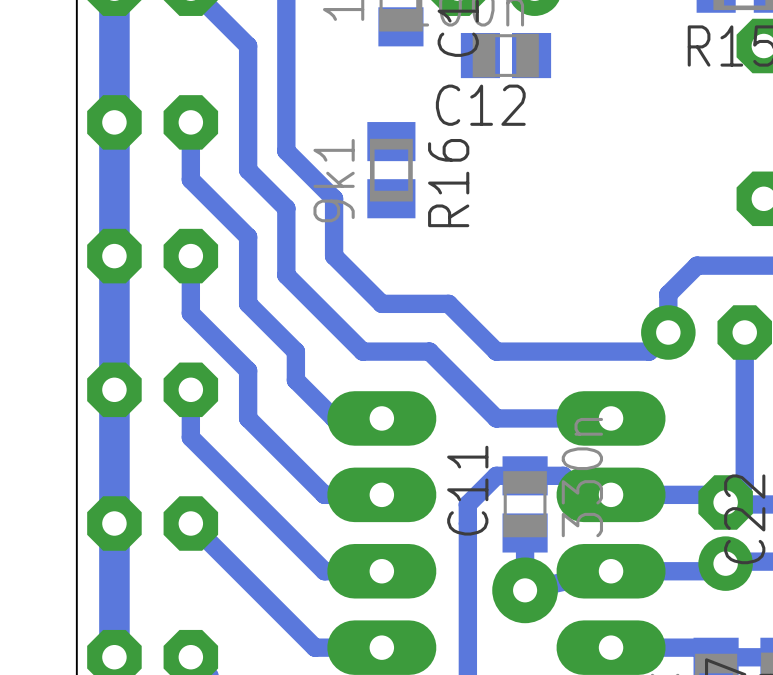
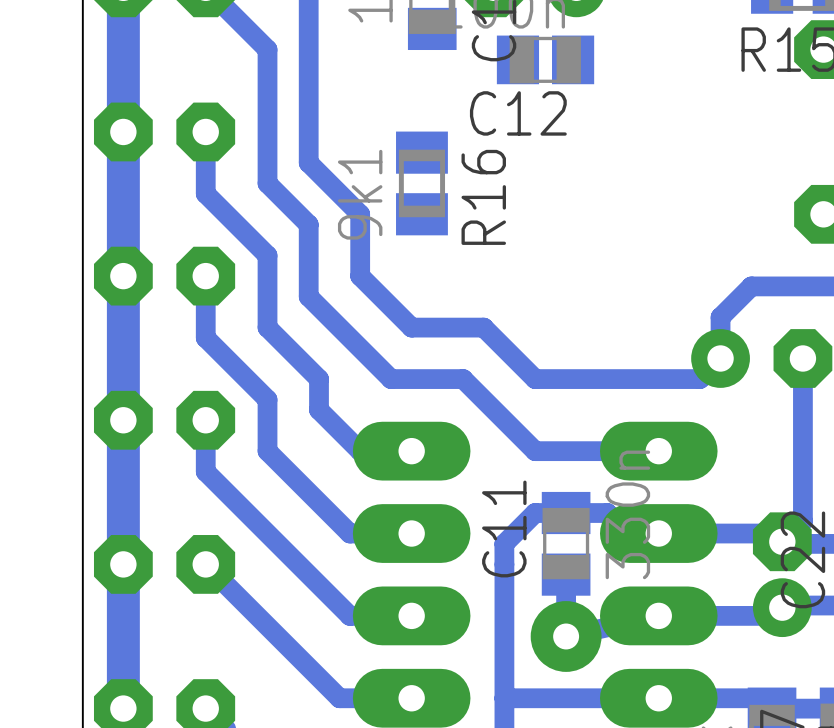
track: none -> (658, 698) (504, 698)

